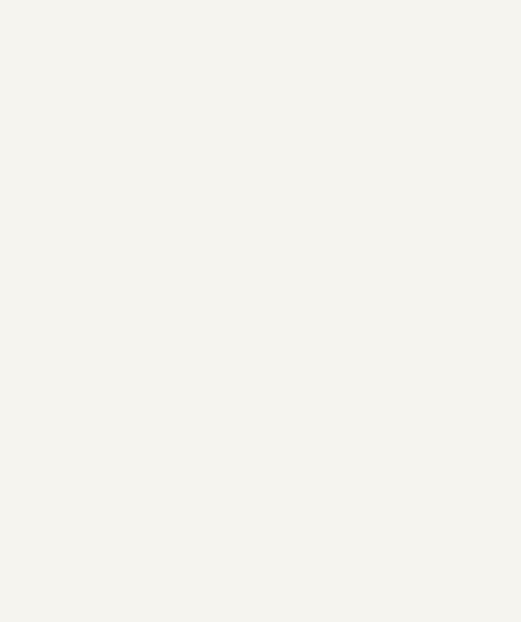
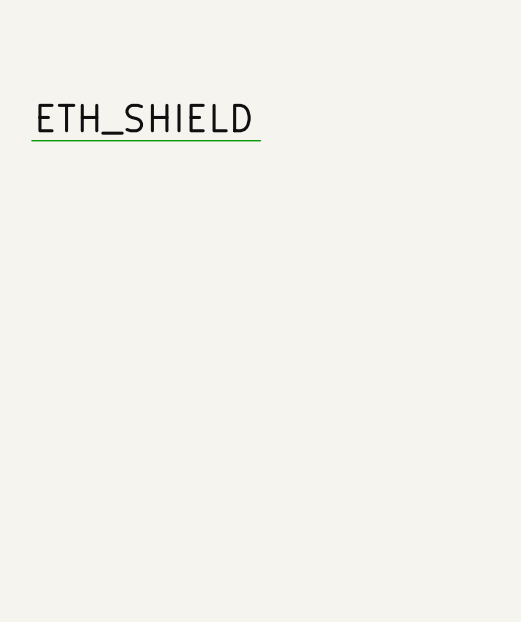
label: none -> ETH_SHIELD (144, 119)
wire: none -> (31, 140) (260, 140)

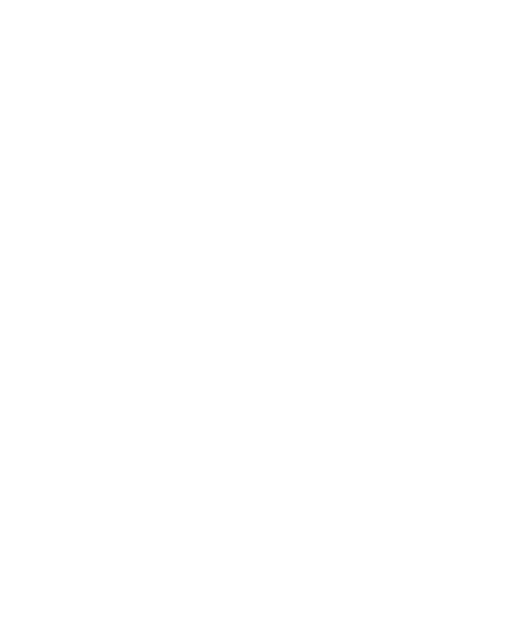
label: ETH_SHIELD (144, 119) -> none
wire: (31, 140) (260, 140) -> none

